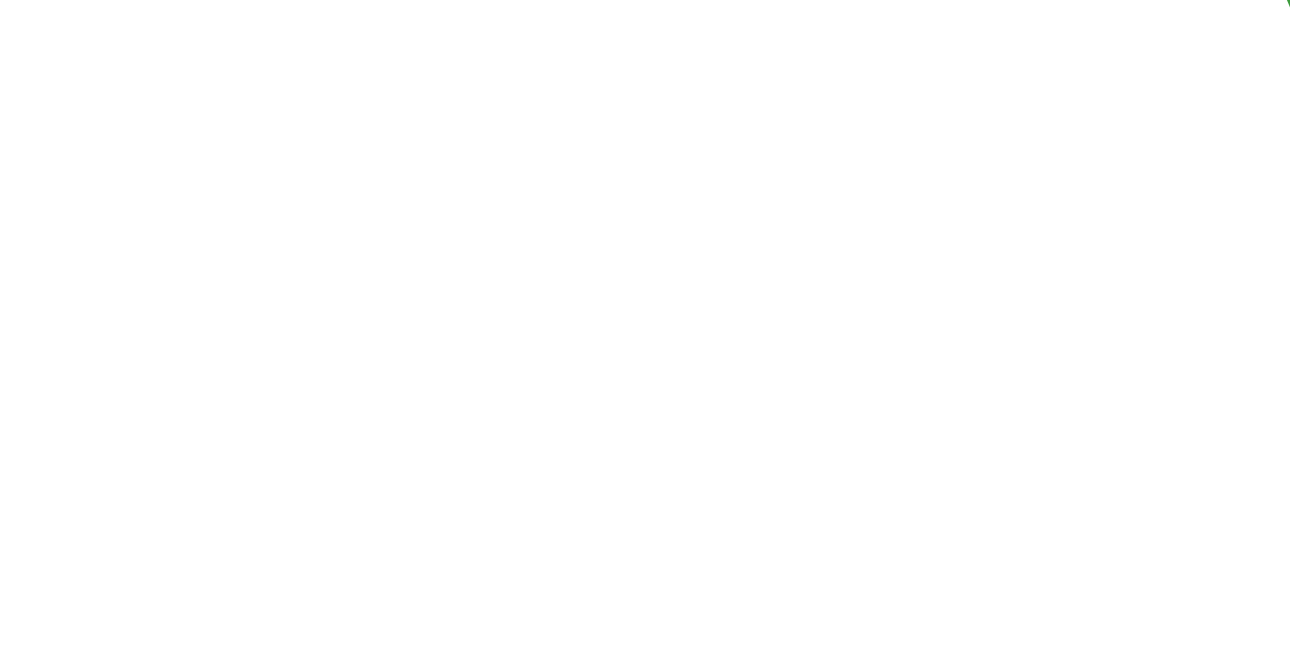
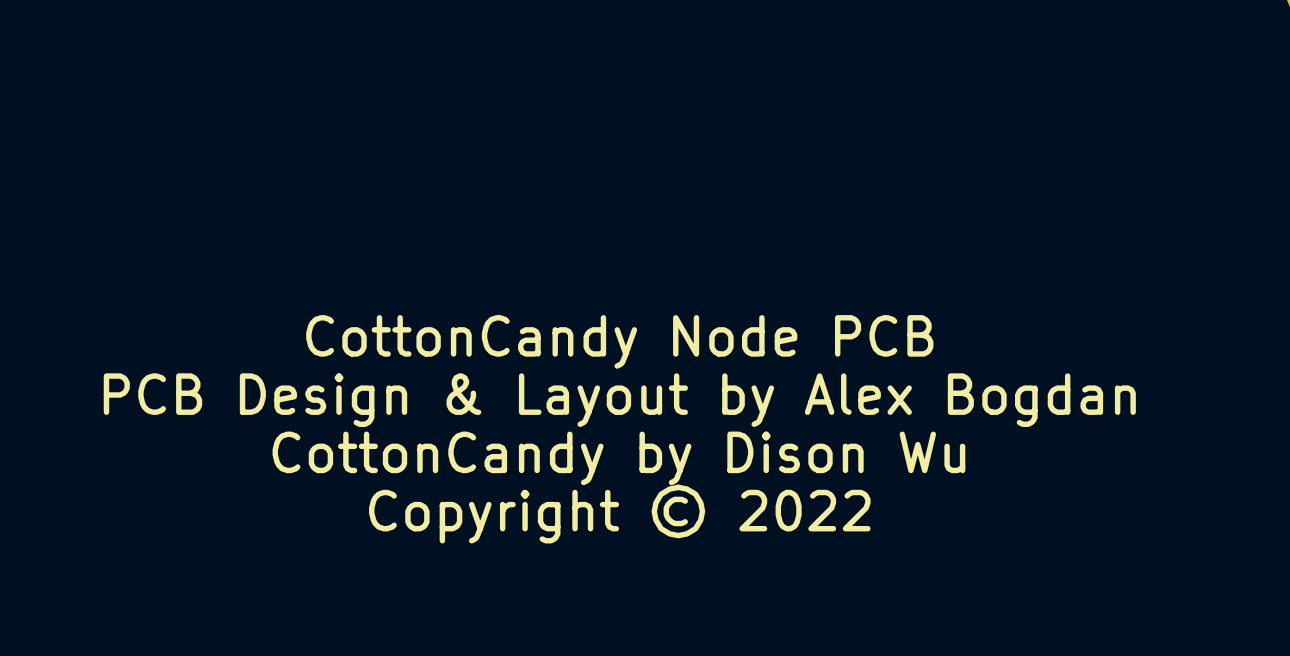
text: none -> CottonCandy Node PCB (619, 341)
text: none -> PCB Design & Layout by Alex Bogdan (619, 400)
text: none -> CottonCandy by Dison Wu (618, 458)
text: none -> Copyright © 2022 (619, 514)

